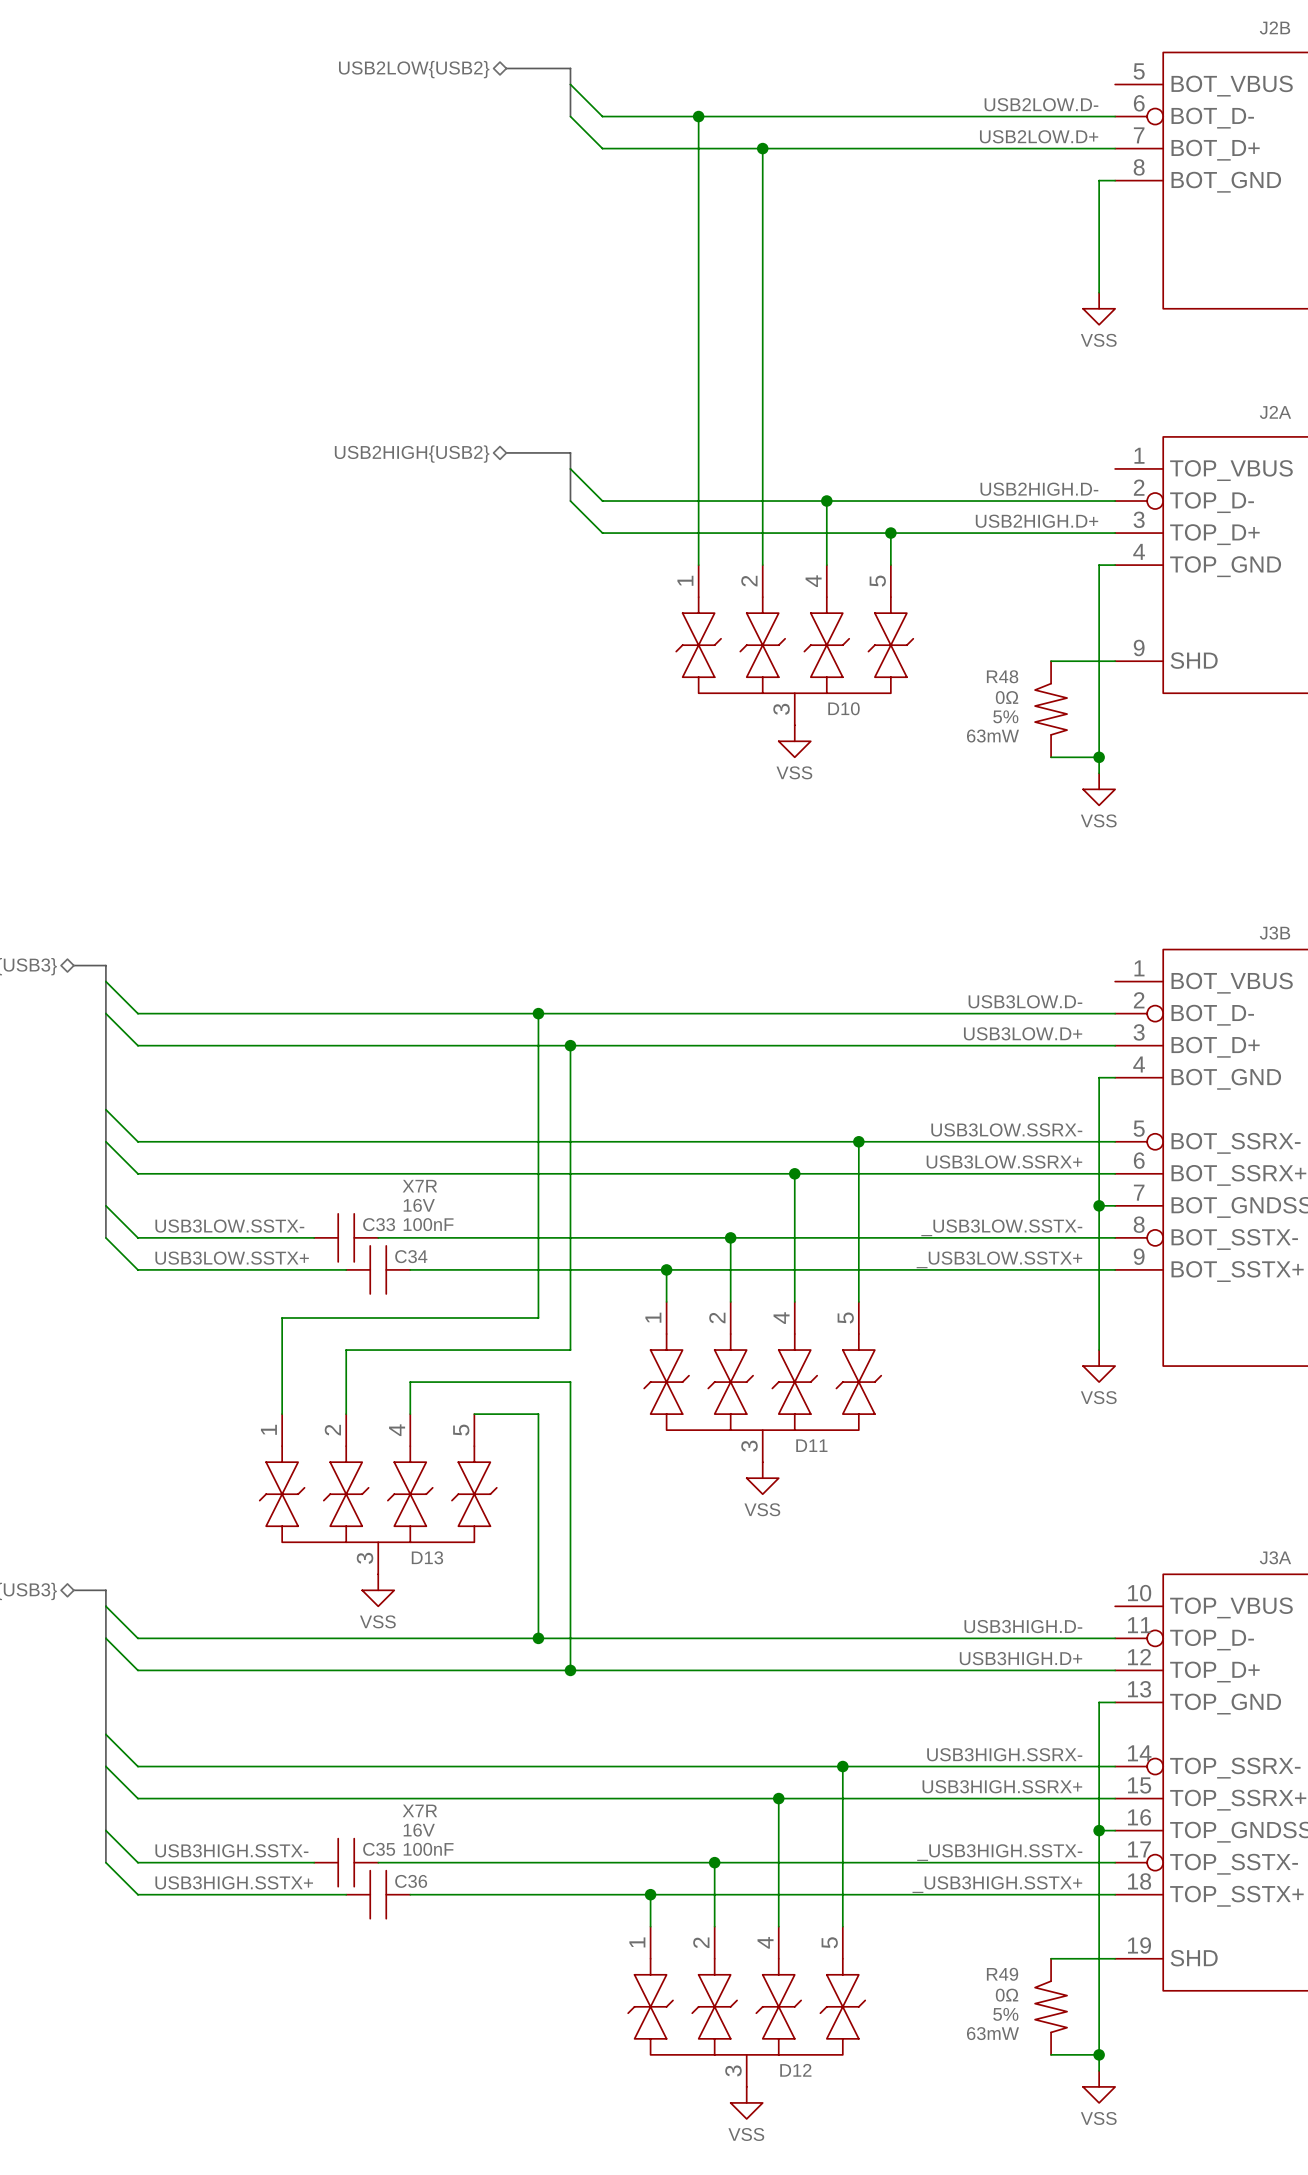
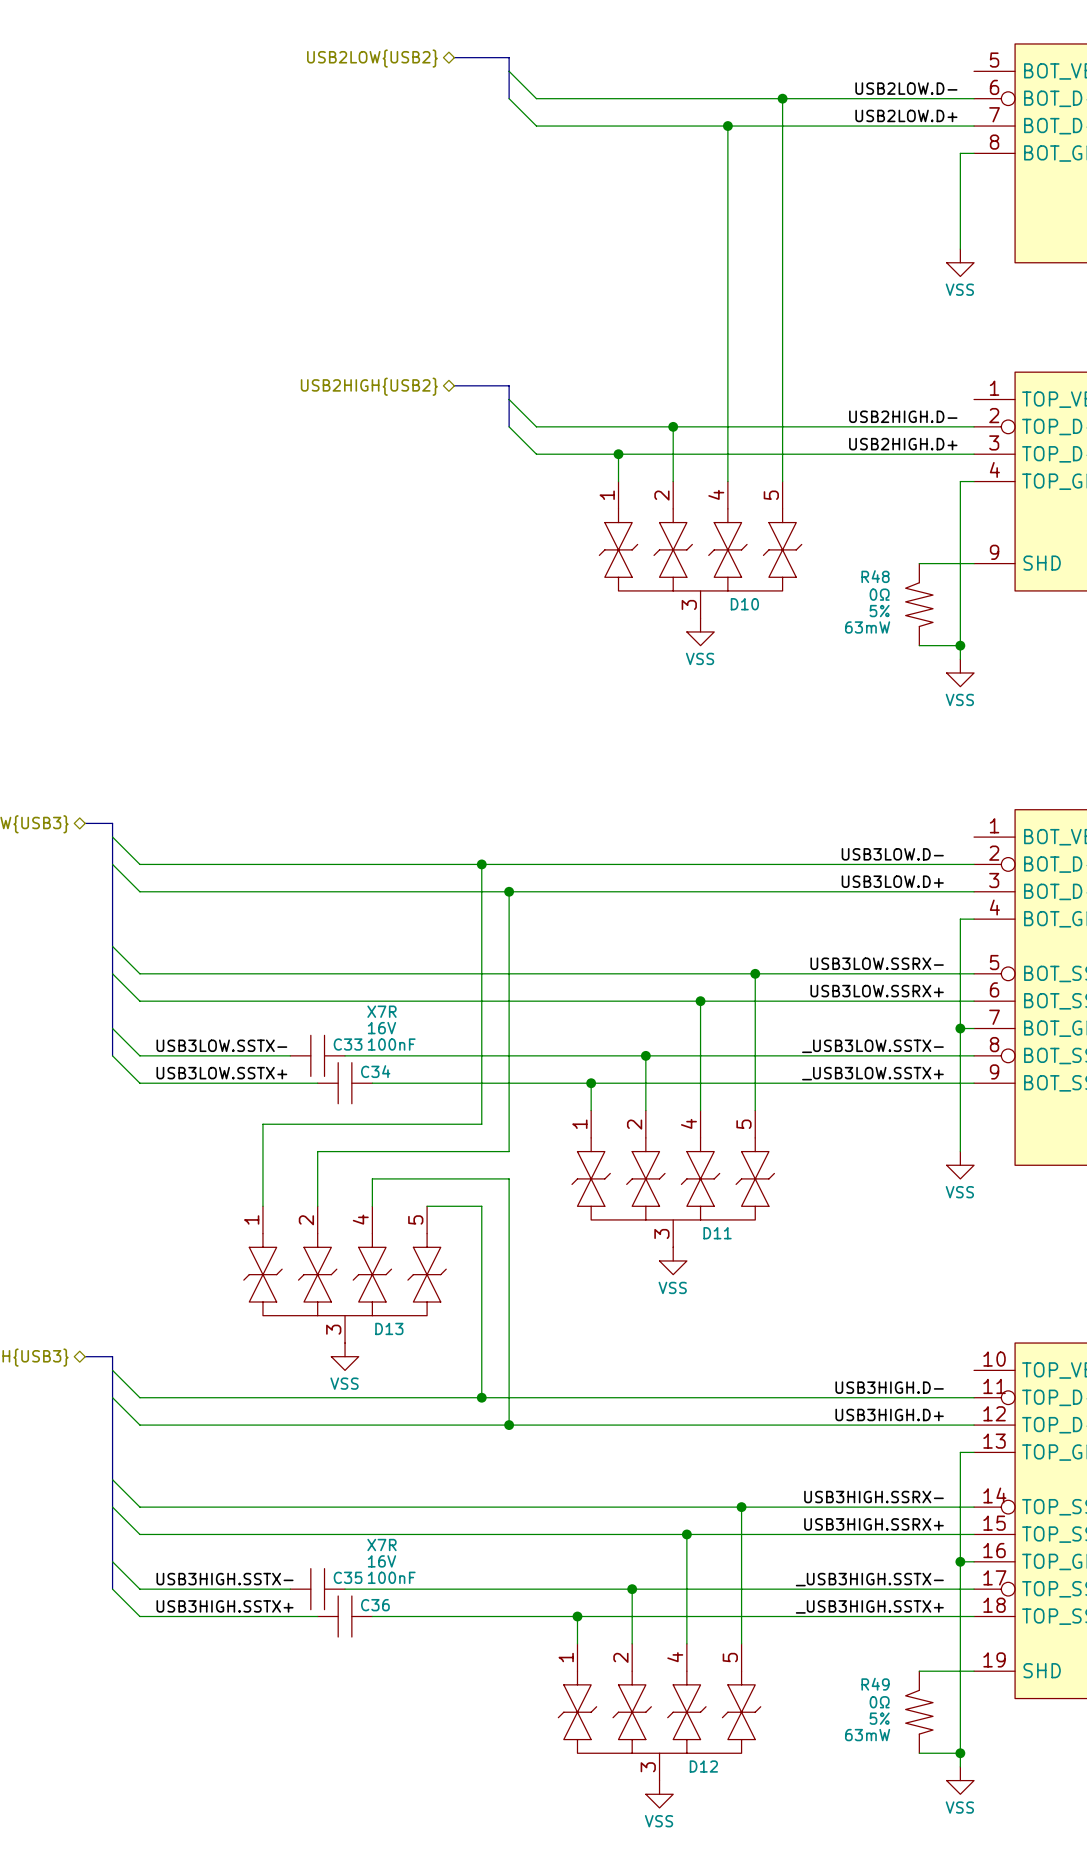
wire: (698, 116) (698, 533) -> (782, 98) (782, 454)
junction: (698, 116) -> none
junction: none -> (782, 98)
wire: (762, 148) (762, 501) -> (727, 126) (727, 426)
junction position: (762, 148) -> (727, 126)
junction position: (826, 501) -> (673, 426)
junction: none -> (618, 454)
junction: (890, 533) -> none

